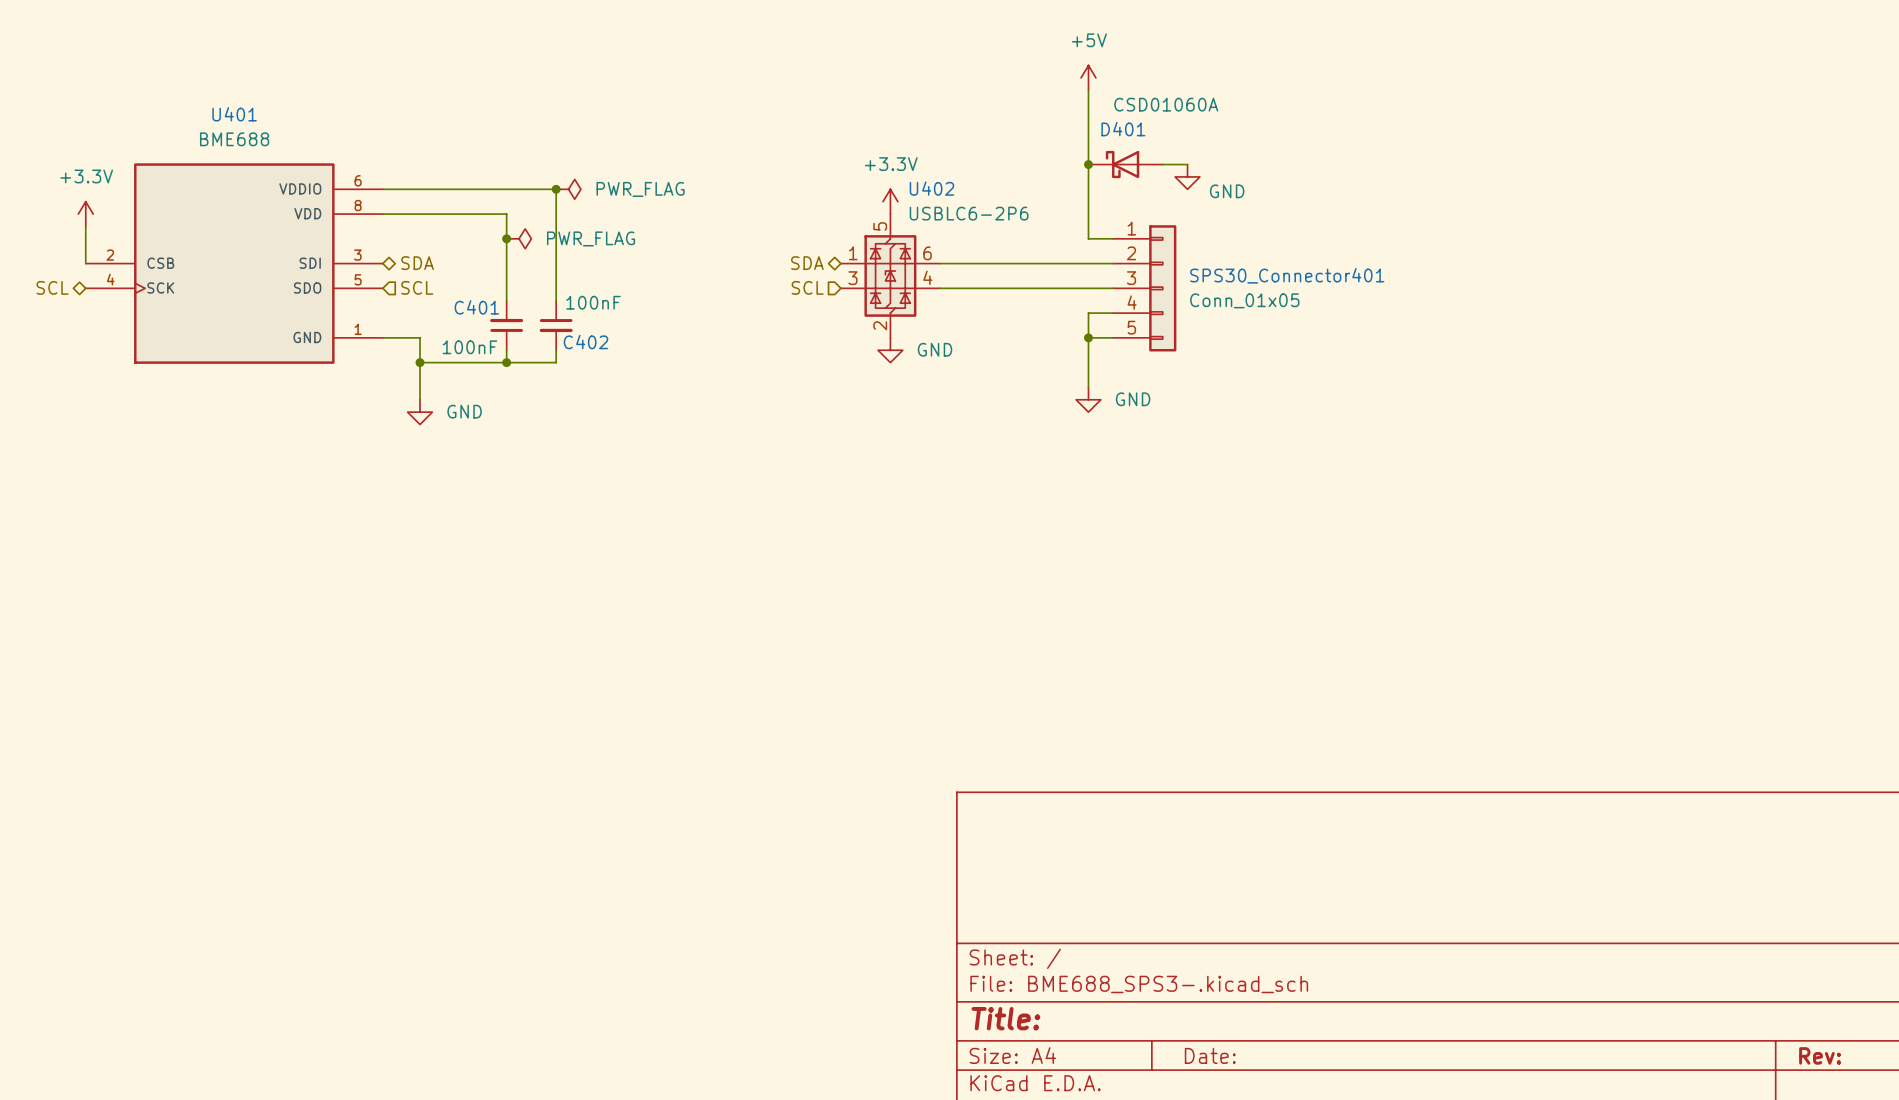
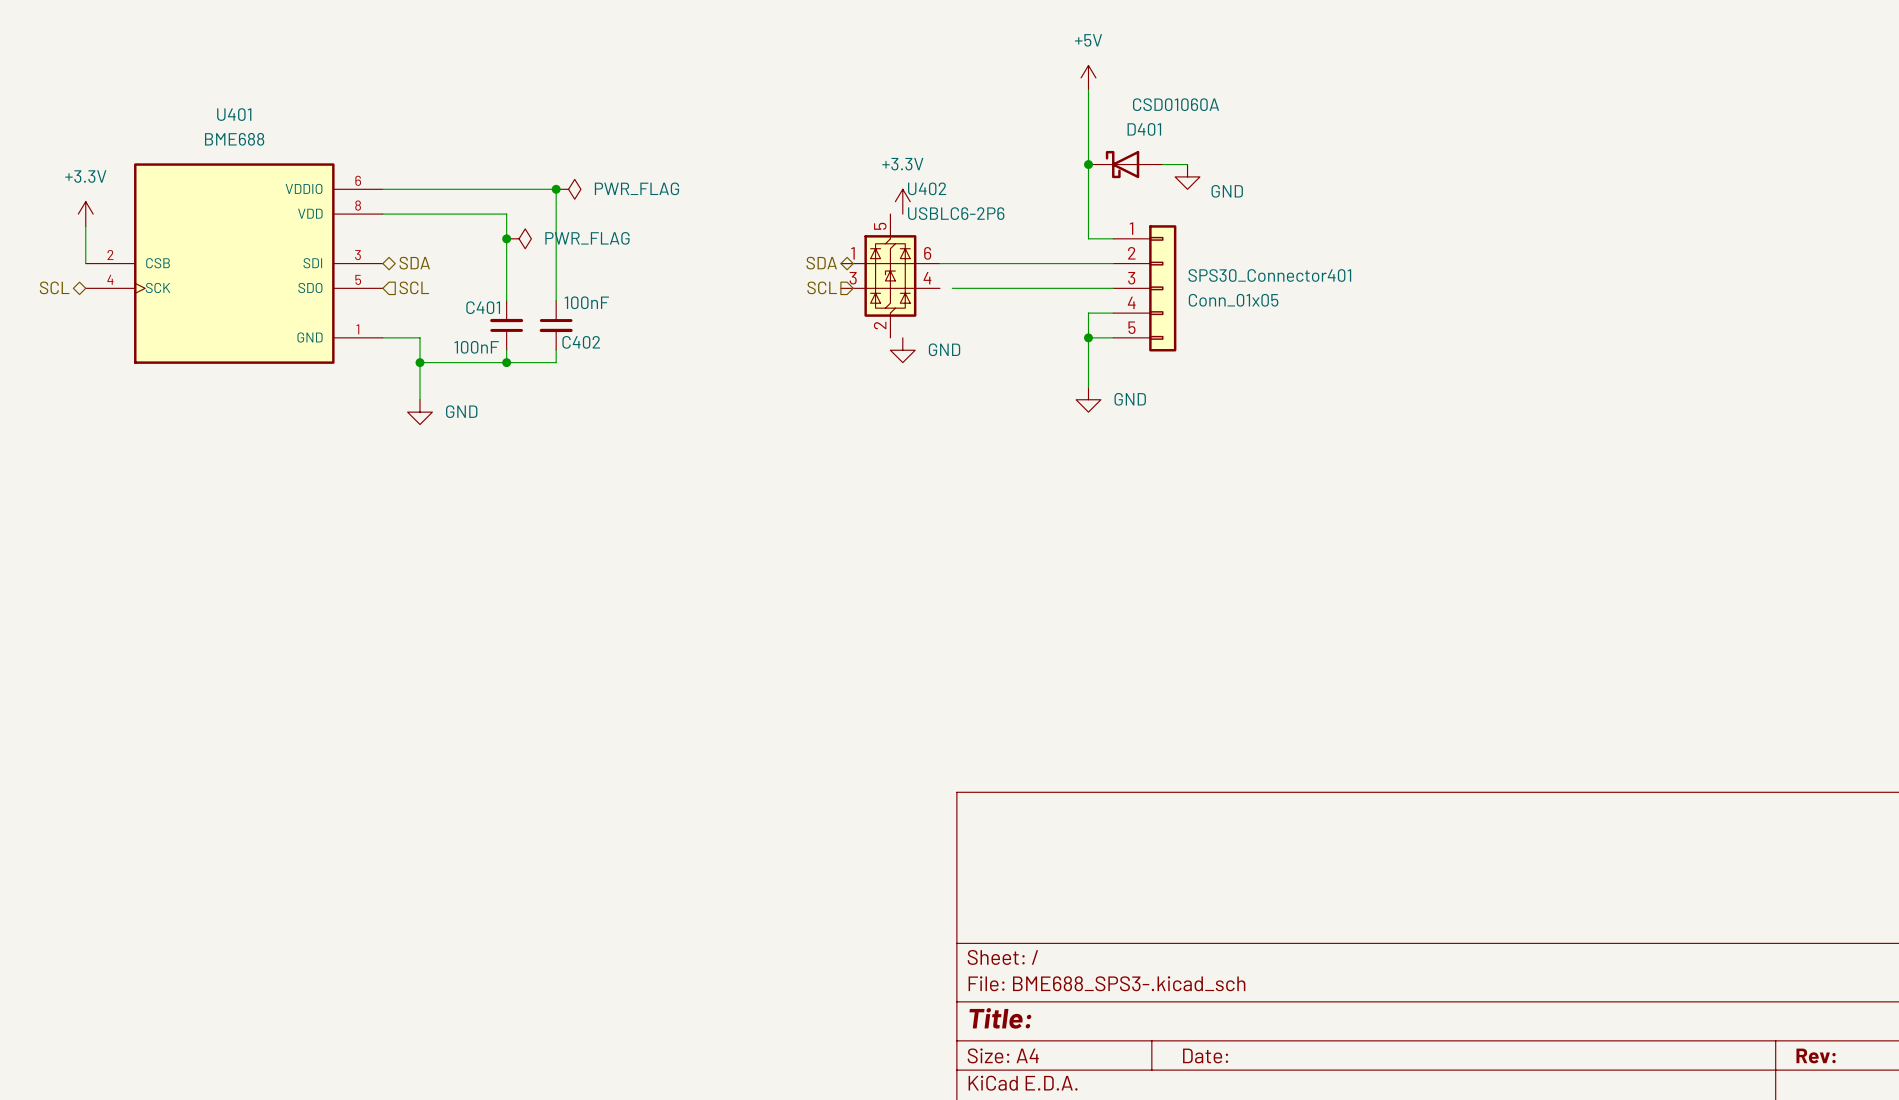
D401 name position: D401 (1123, 129) -> D401 (1144, 129)
power symbol position: +3.3V (890, 201) -> +3.3V (902, 201)
hierarchical label position: SDA (807, 263) -> SDA (821, 263)
hierarchical label position: SCL (807, 287) -> SCL (822, 287)
wire: (939, 288) (952, 288) -> none
power symbol position: GND (890, 350) -> GND (902, 350)

